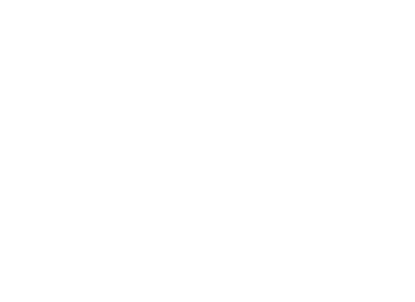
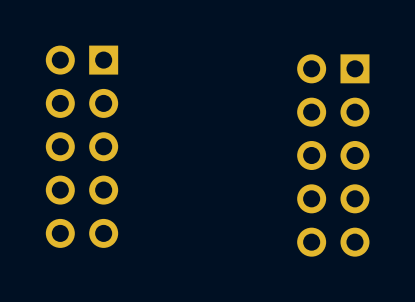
part: none -> (81, 146)
part: none -> (333, 155)

